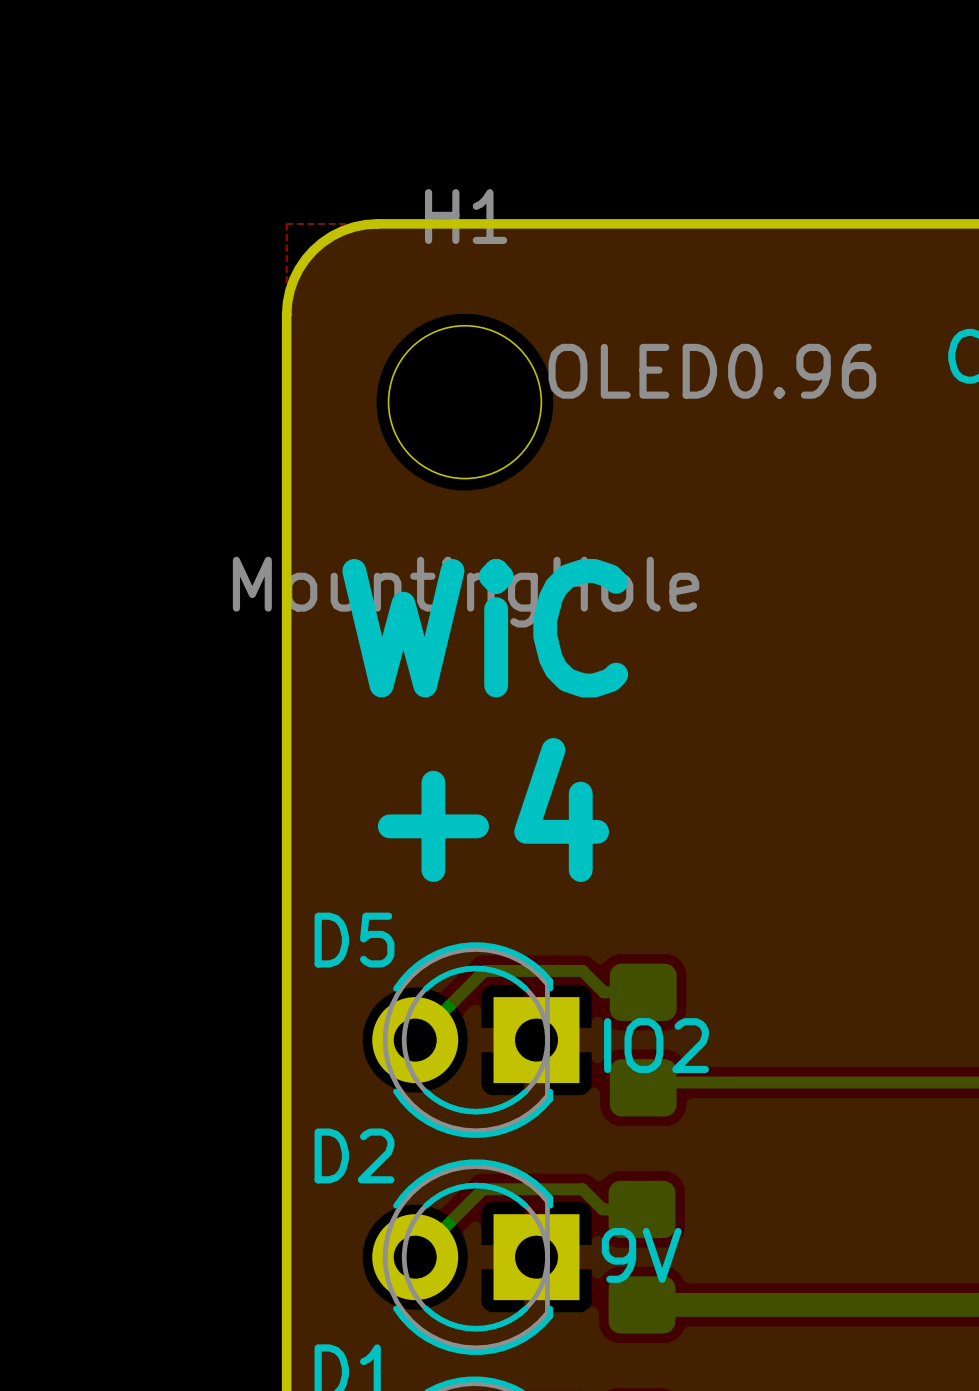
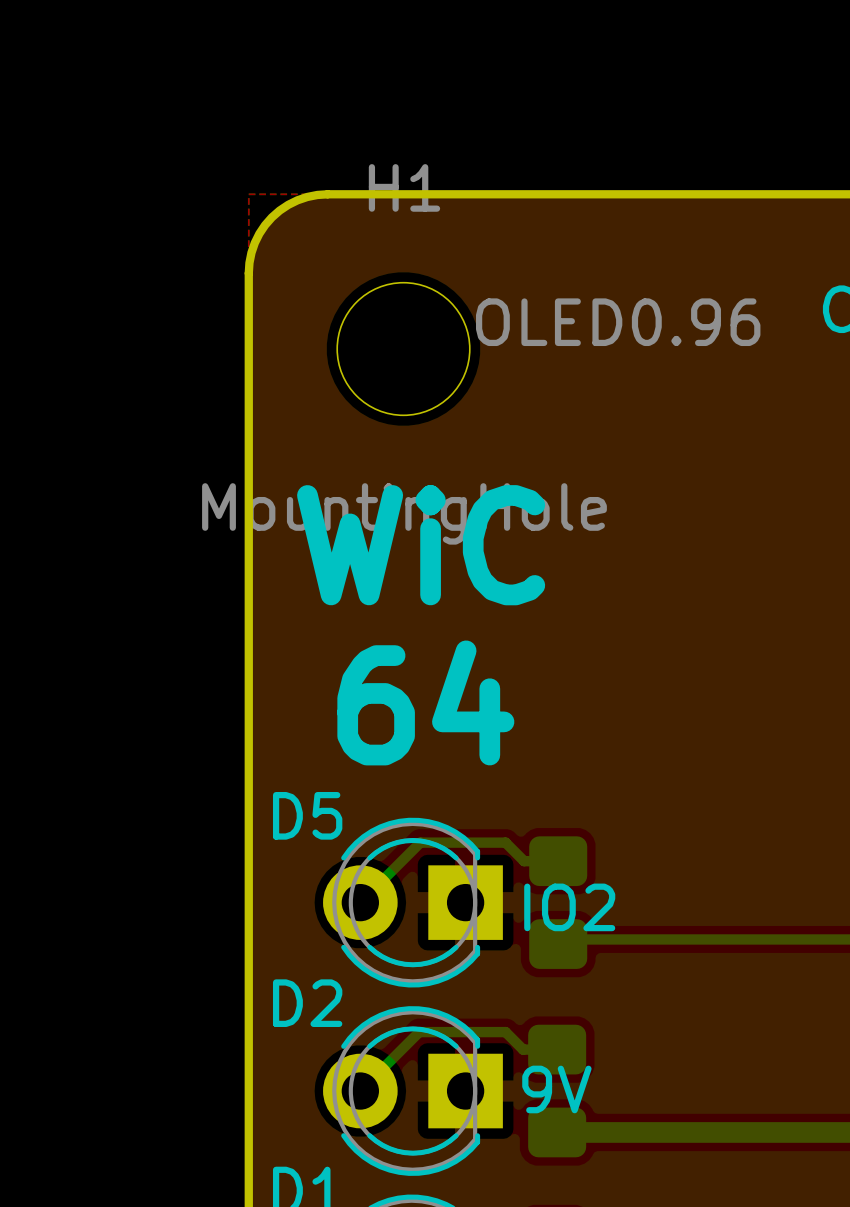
text: +4 (493, 809) -> 64 (425, 702)

